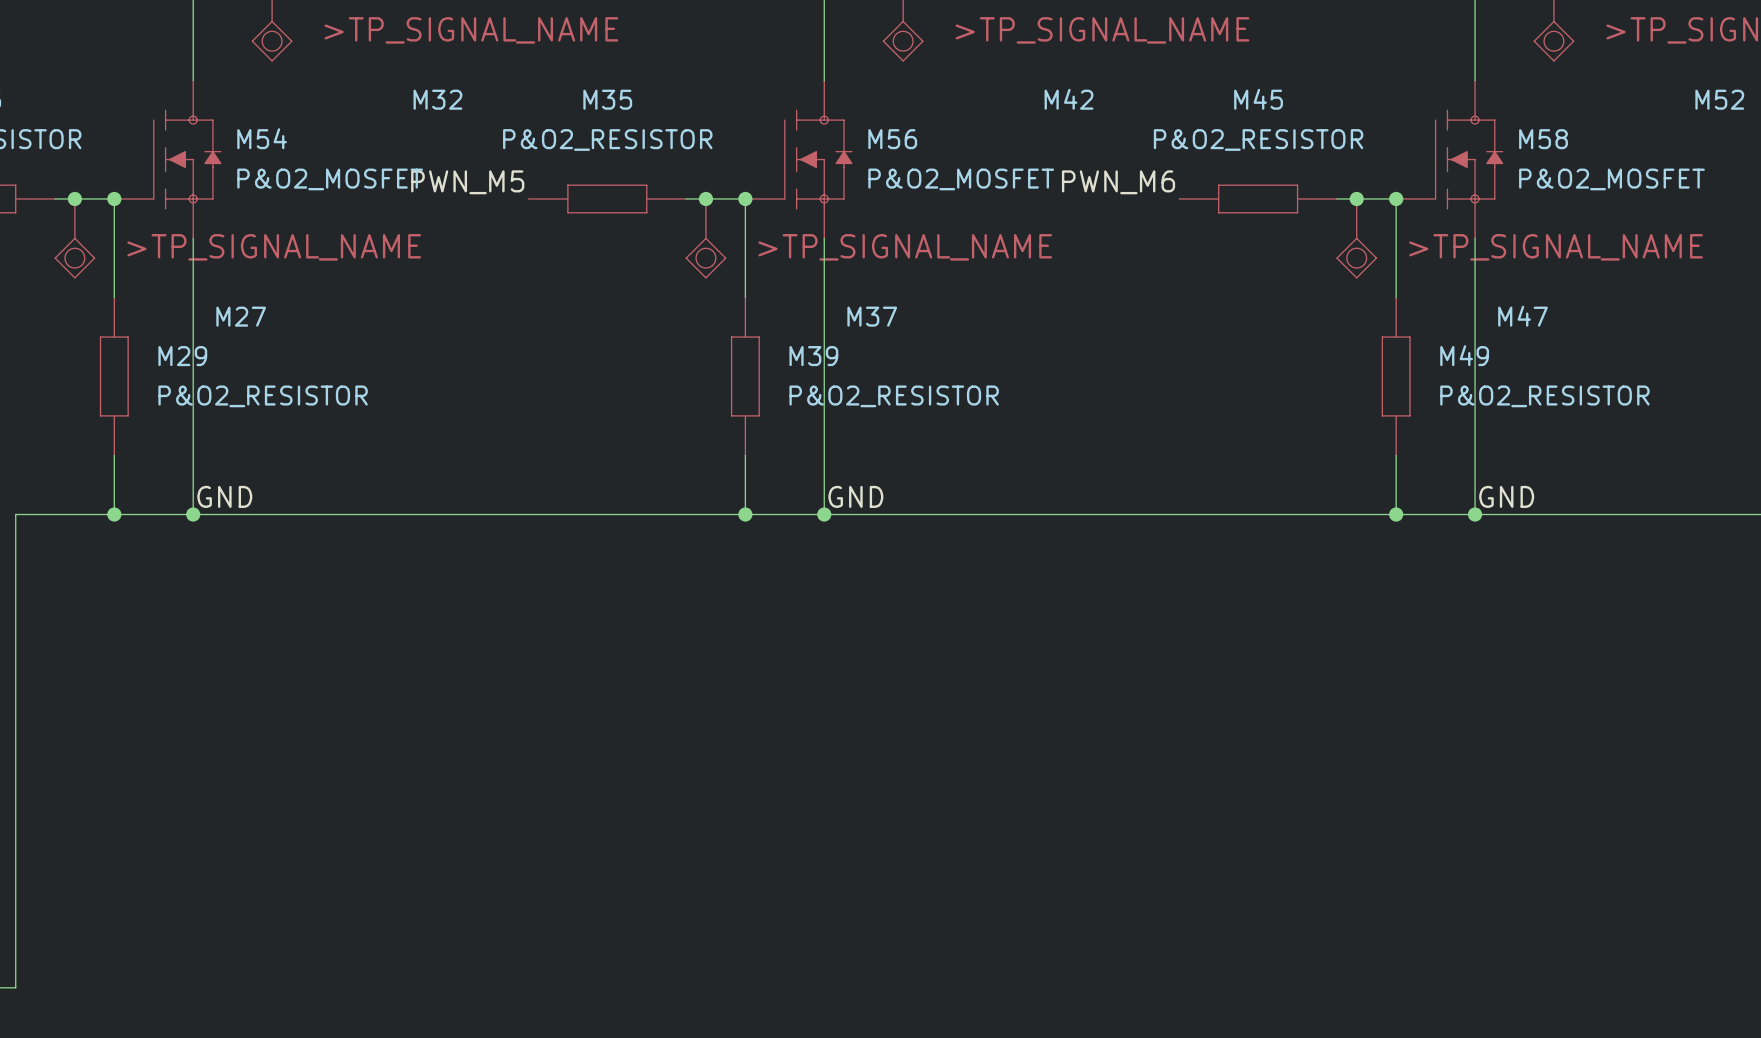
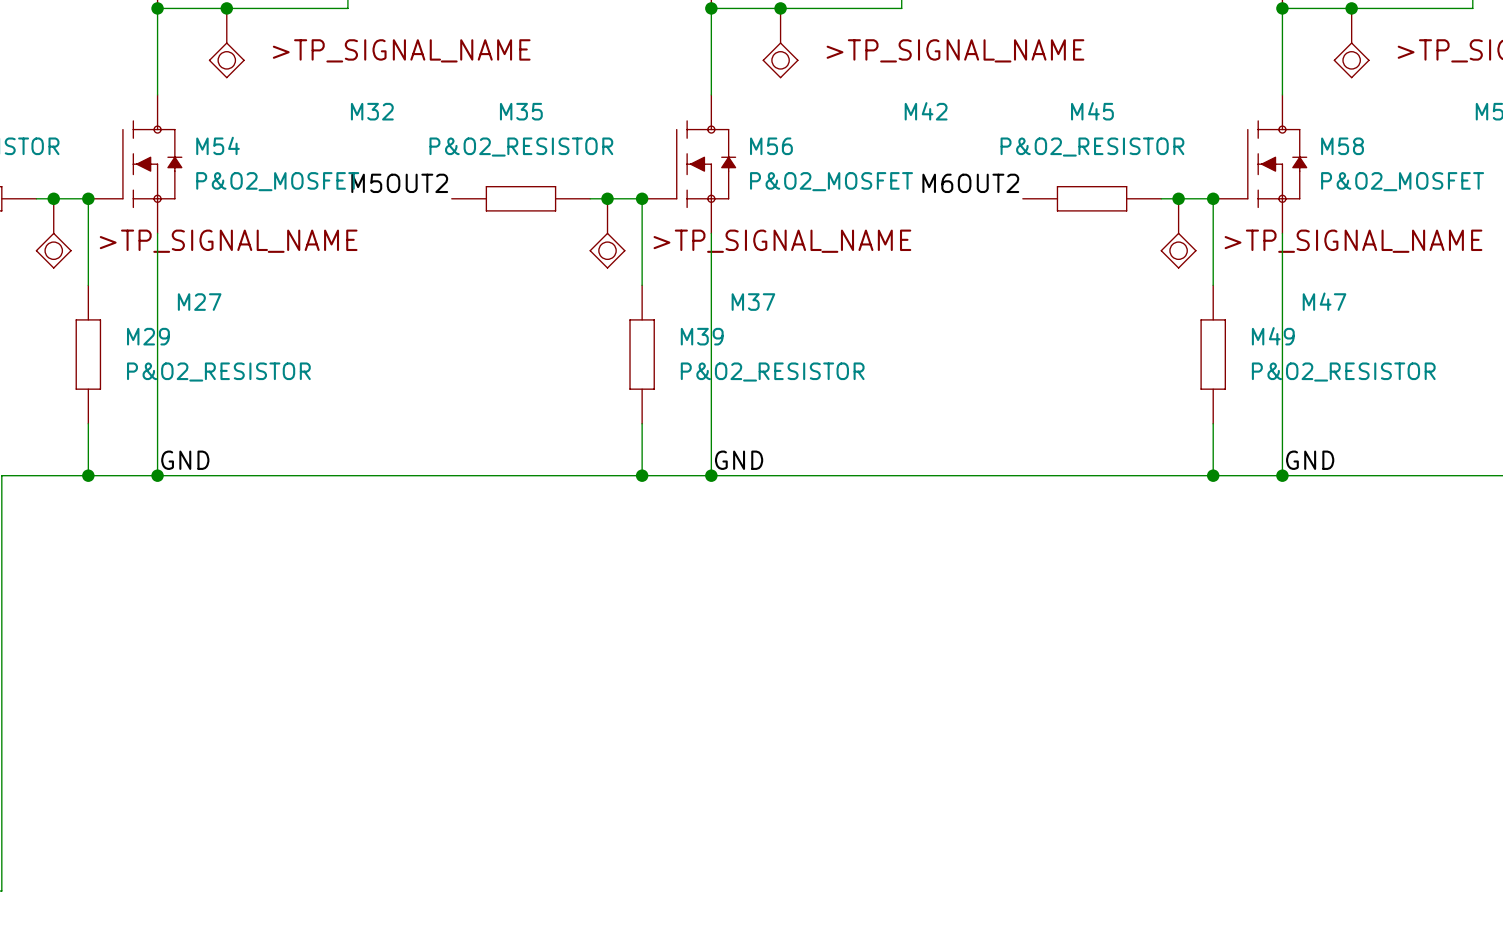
label: PWN_M5 (467, 182) -> M5OUT2 (399, 183)
label: PWN_M6 (1118, 182) -> M6OUT2 (970, 183)

